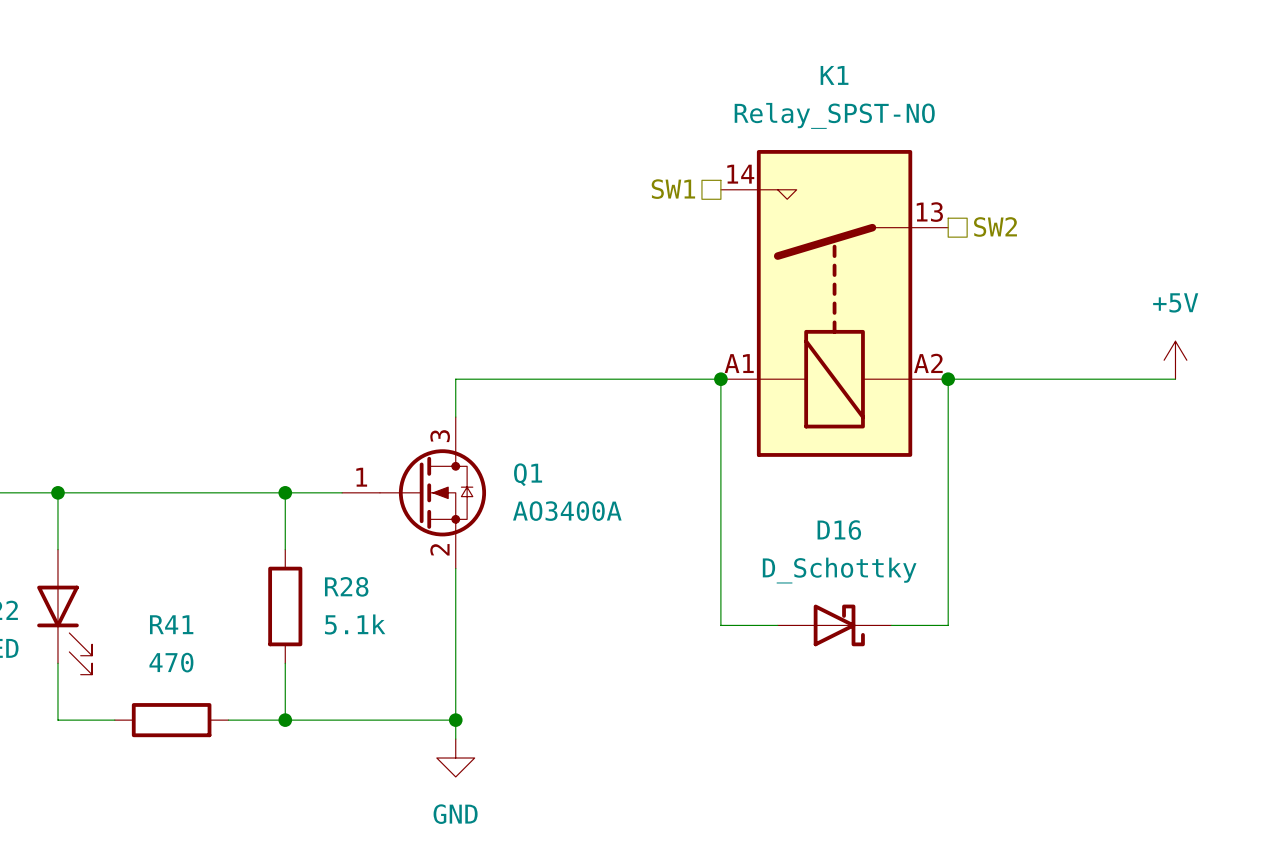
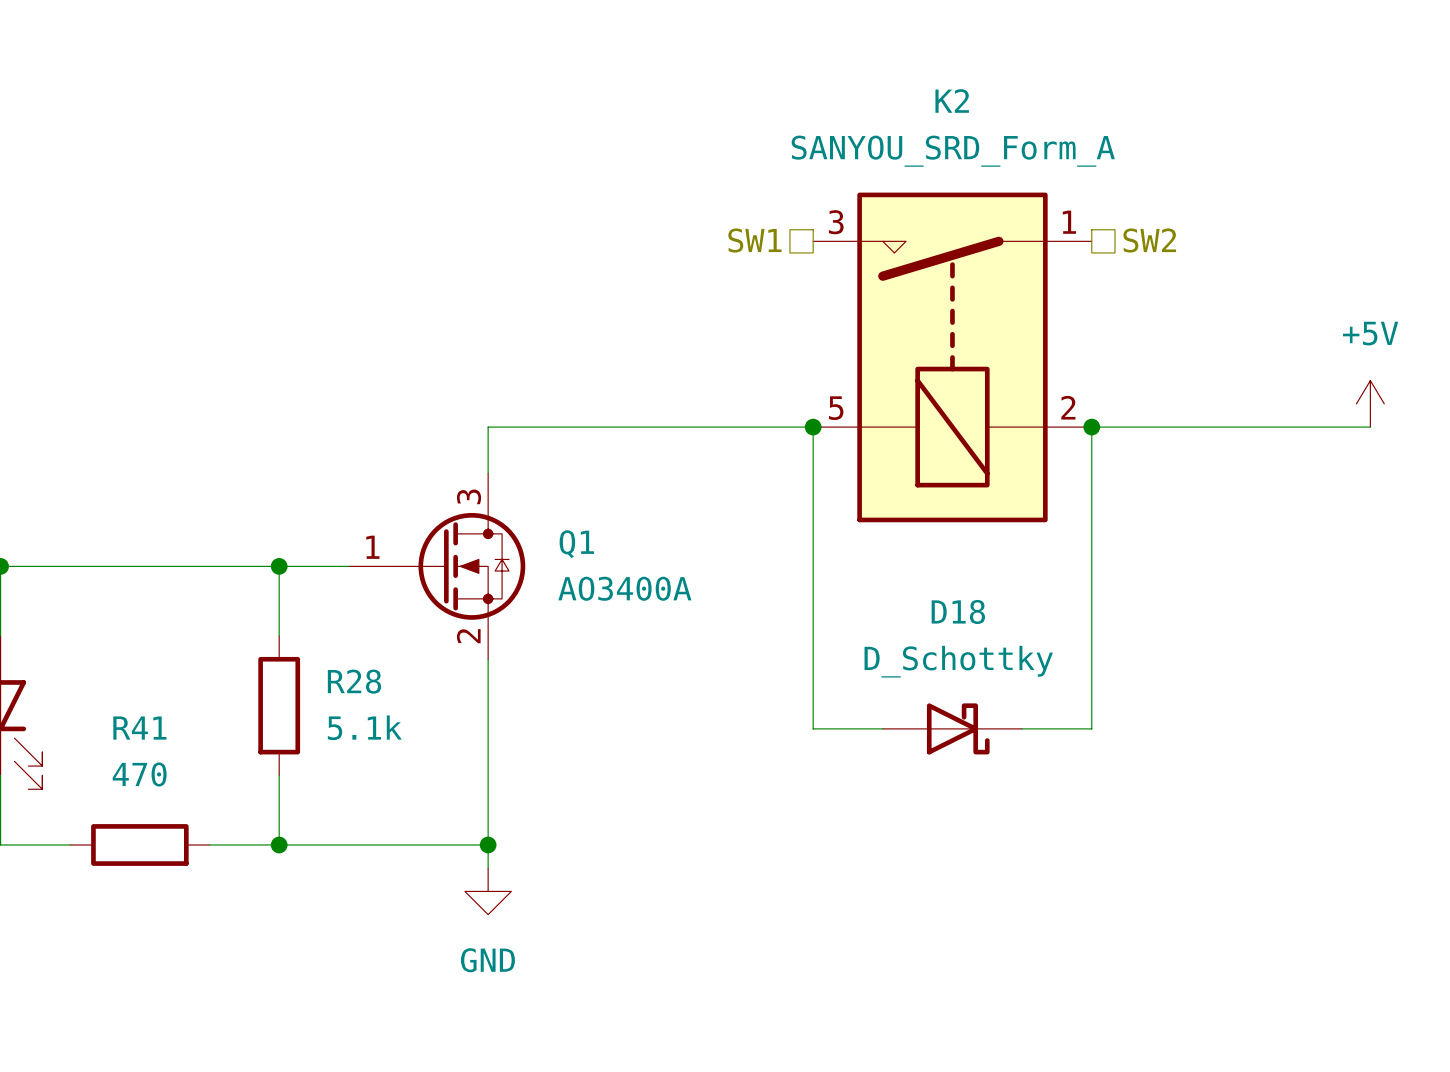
hierarchical label position: SW1 (673, 189) -> SW1 (754, 240)
K1: Relay_SPST-NO (834, 303) -> none
K2: none -> SANYOU_SRD_Form_A (952, 357)
D16 name: D16 (839, 530) -> D18 (958, 611)

